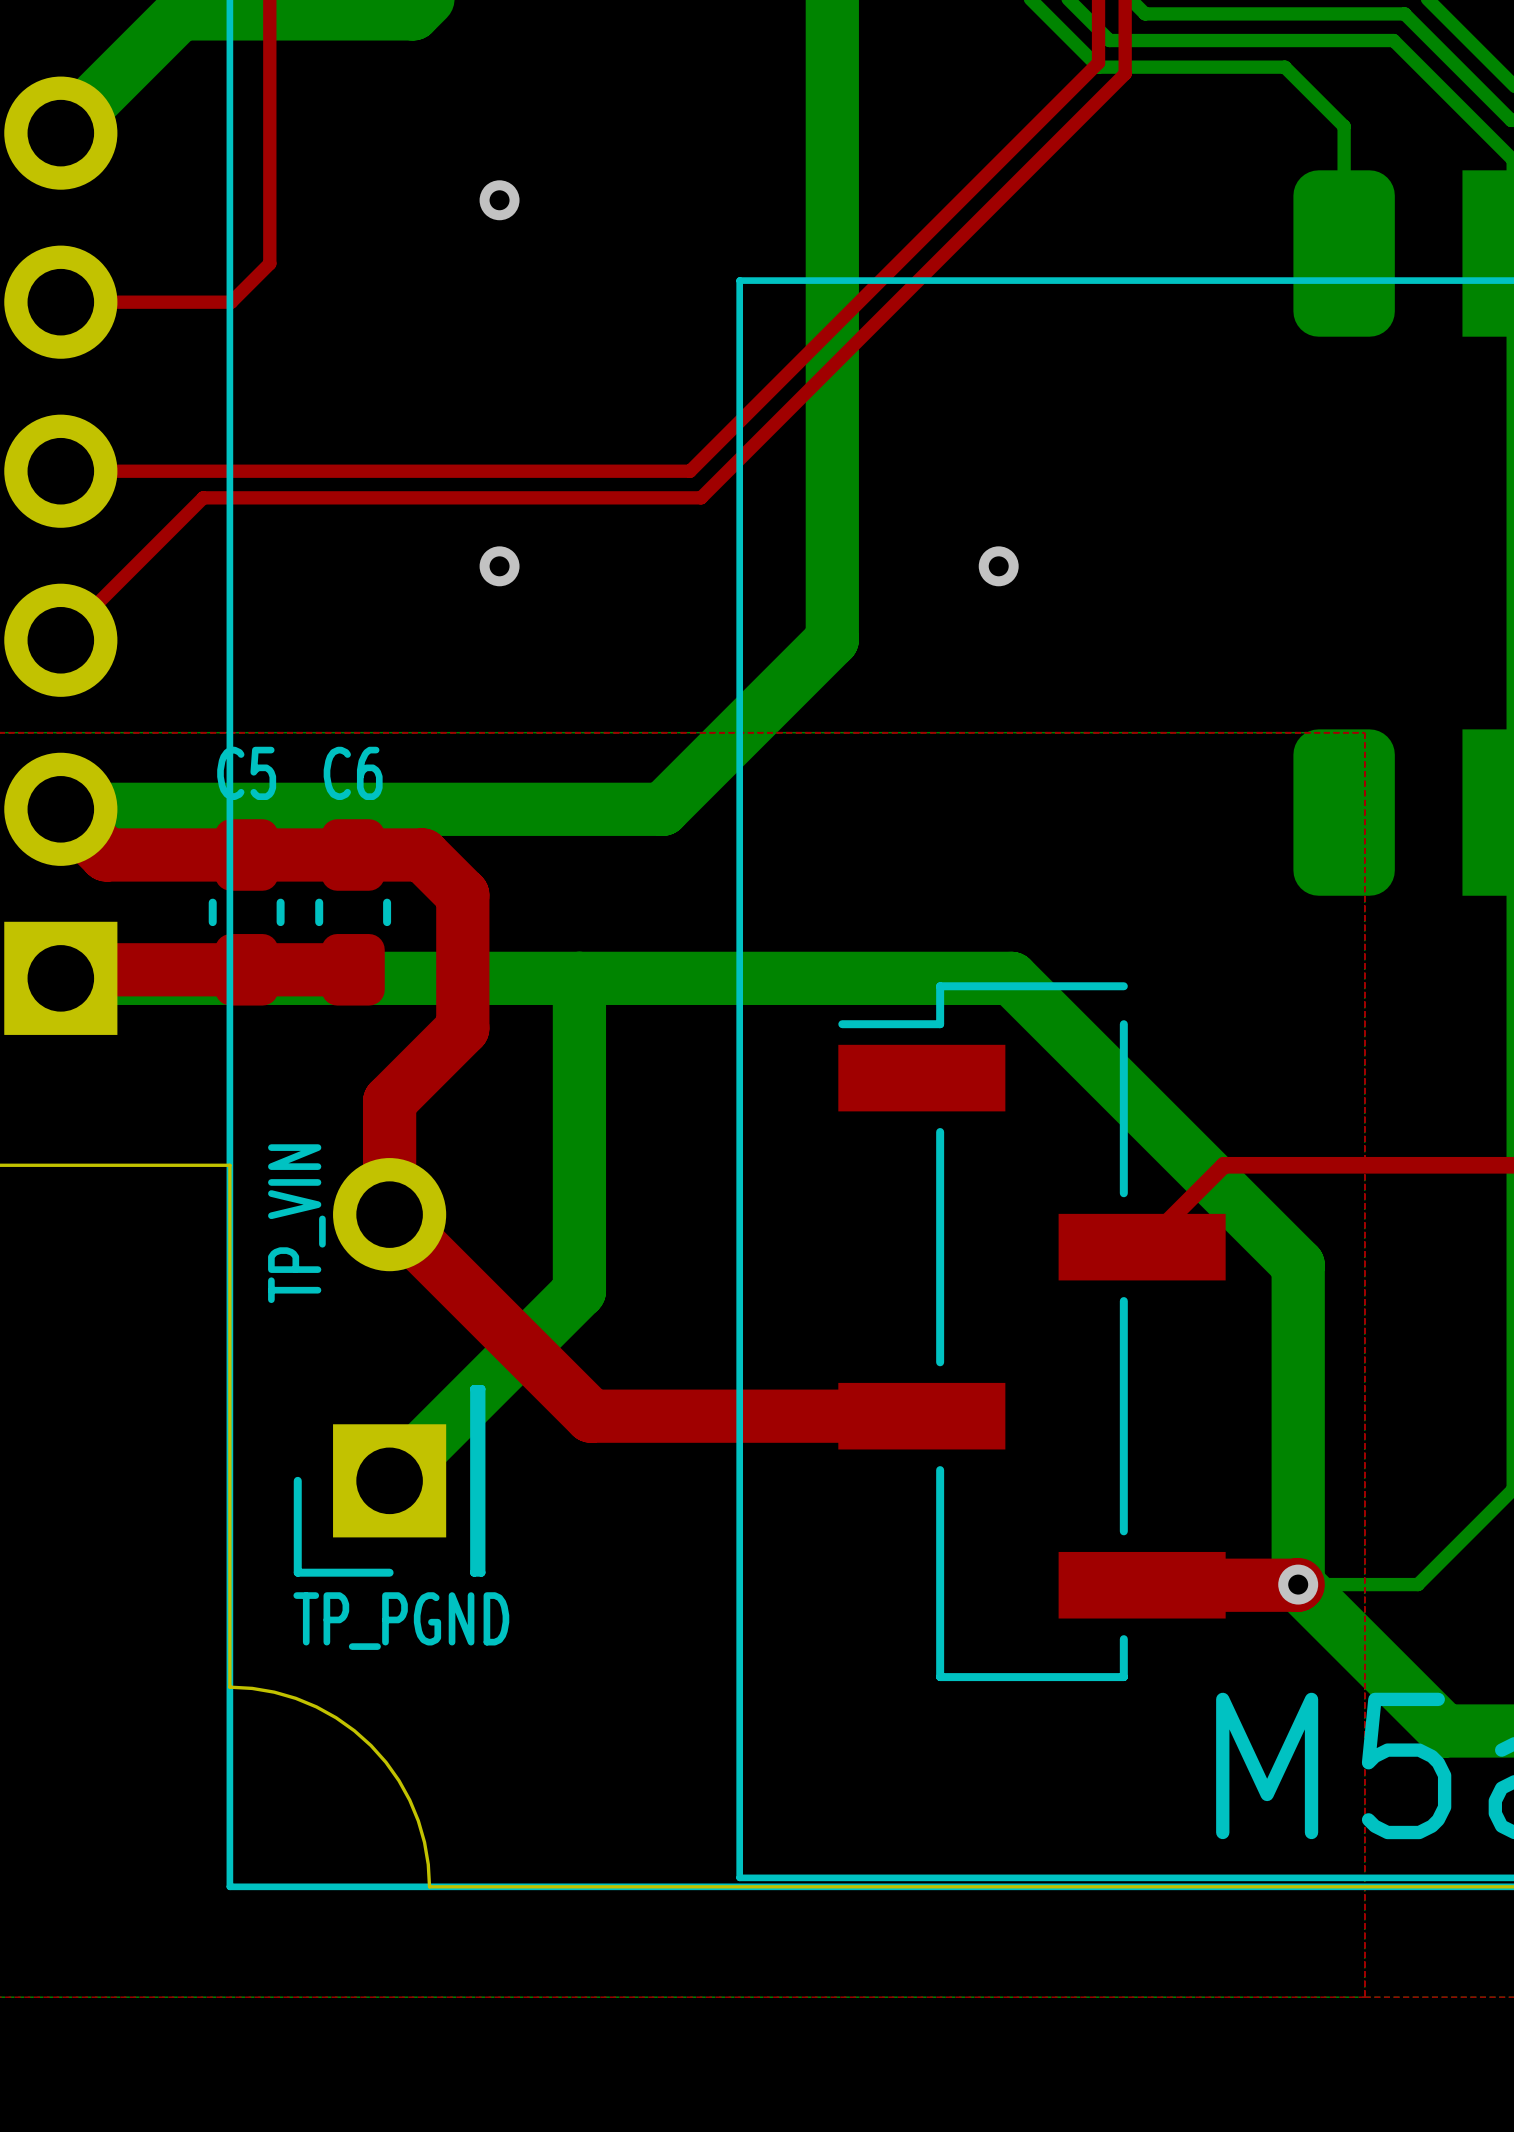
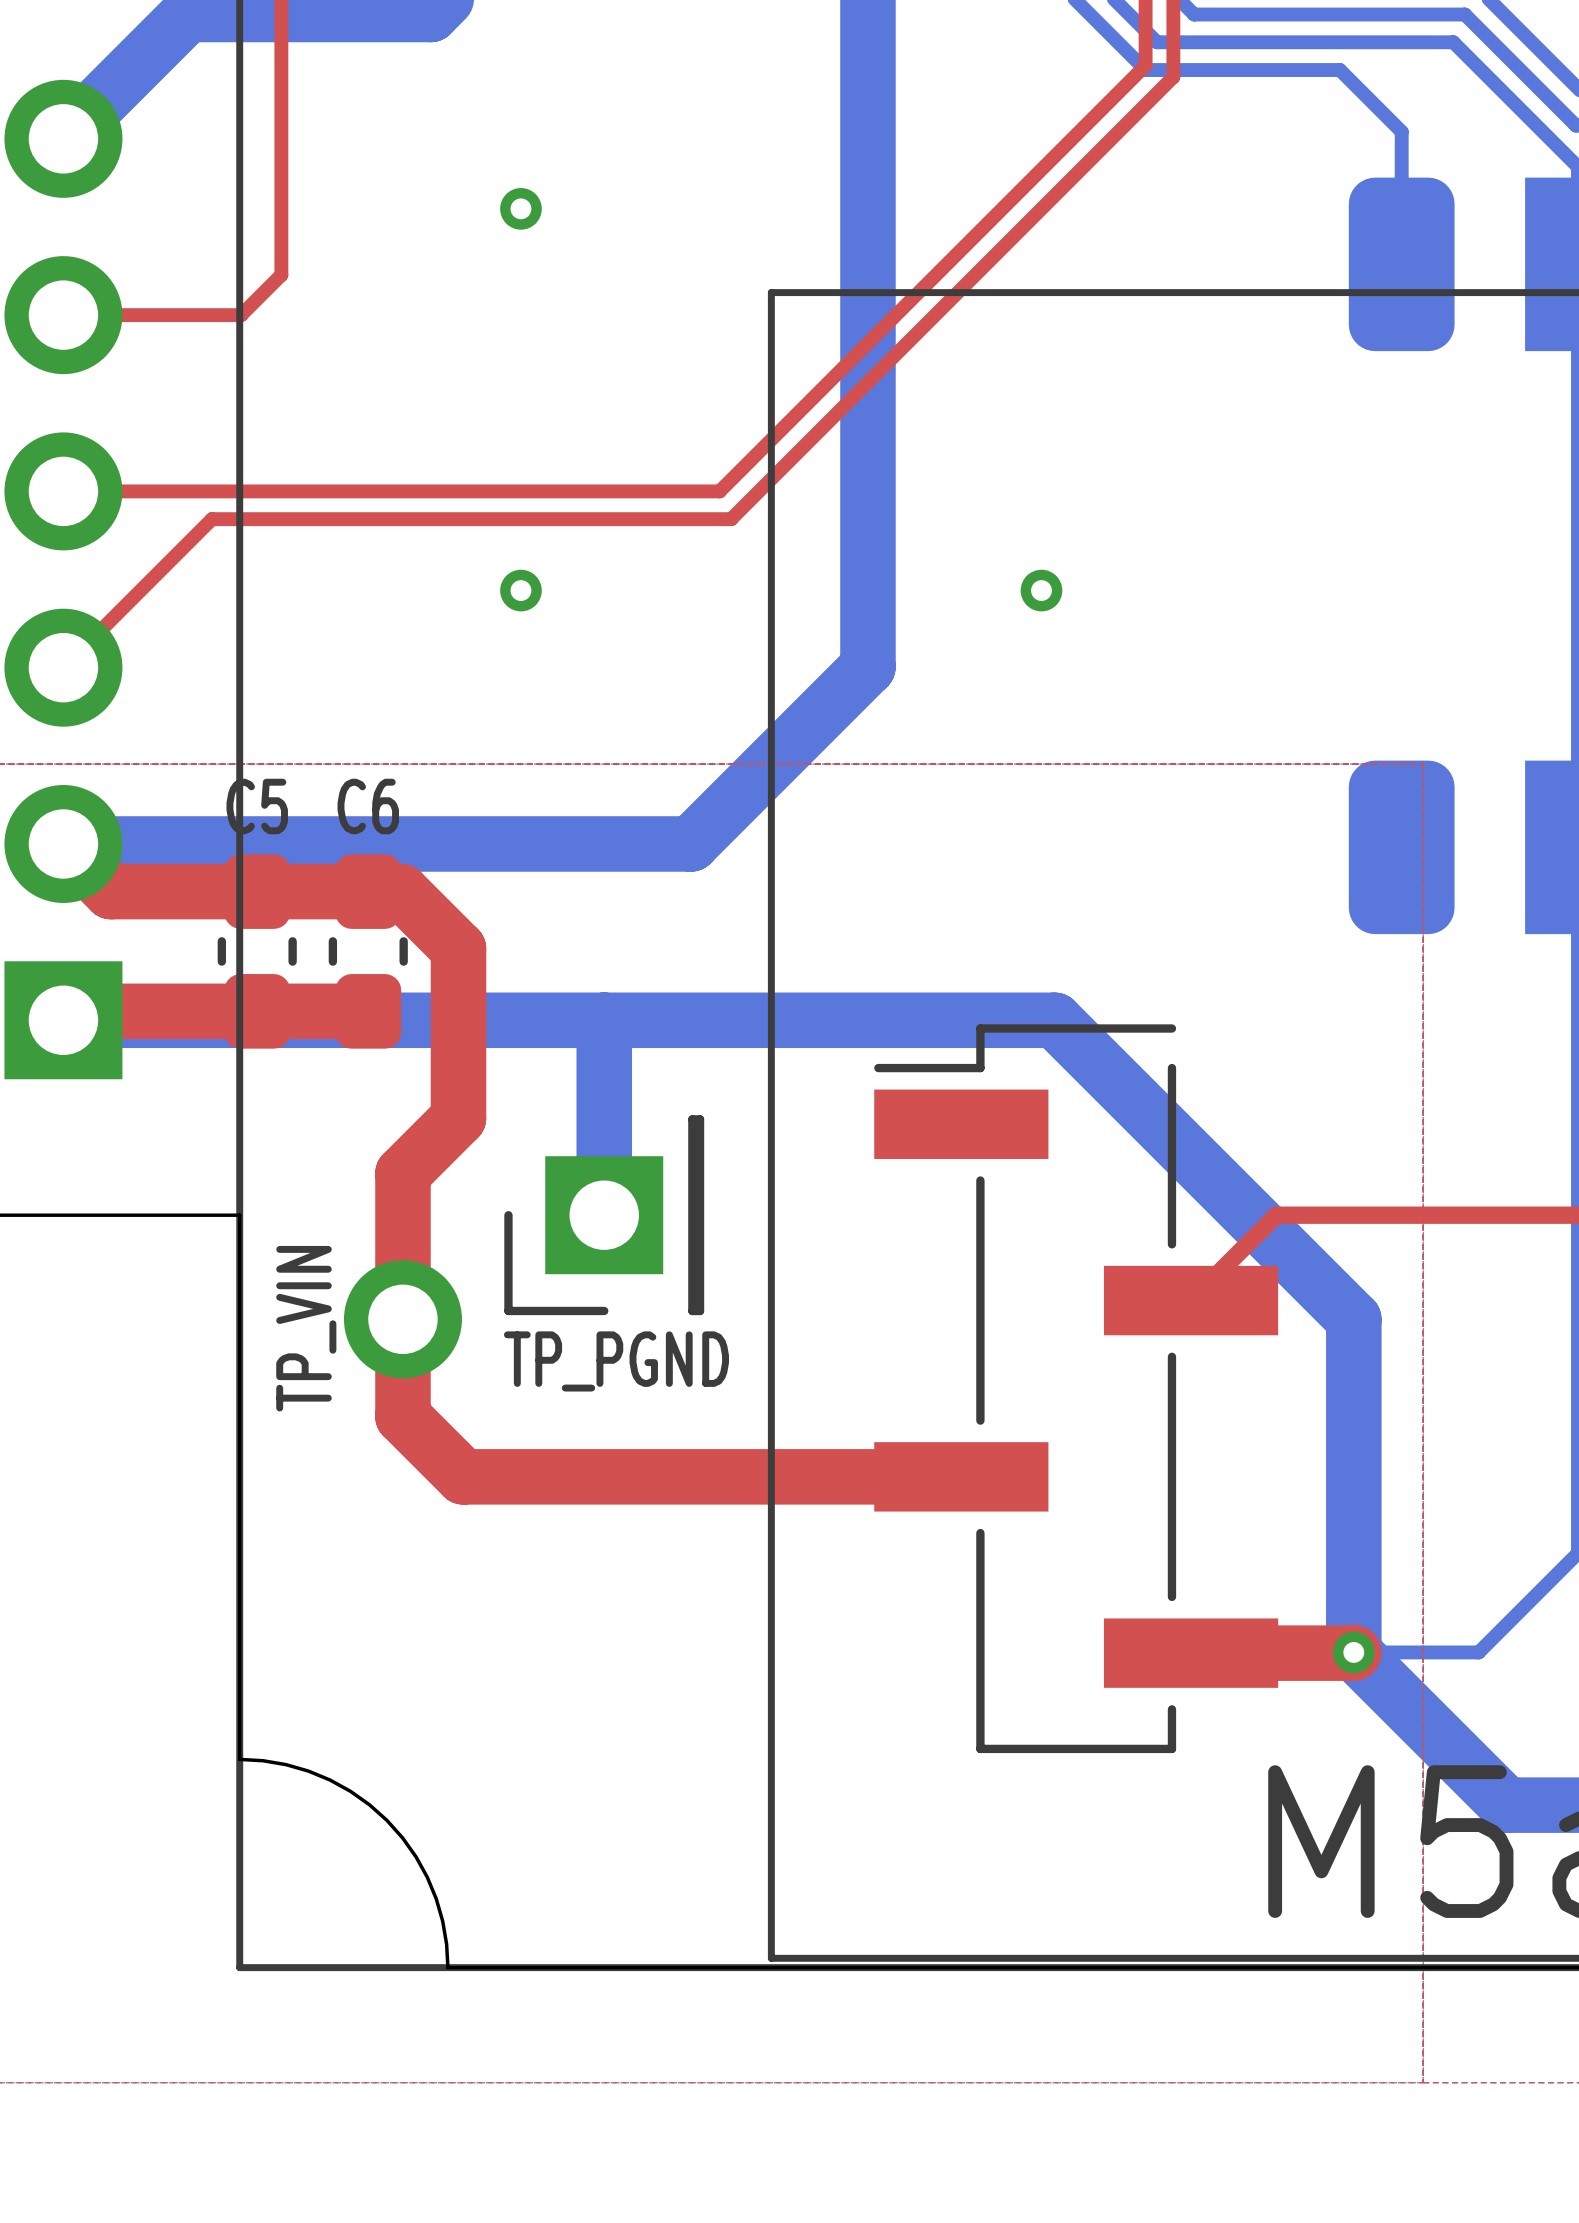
top track: (384, 854) (422, 854) (462, 895) (462, 1028) (389, 1101) (389, 1214) (591, 1416) -> (401, 891) (458, 948) (458, 1118) (402, 1173) (402, 1416) (463, 1476) (616, 1476)
bottom track: (579, 1165) (579, 1291) (389, 1480) -> none
part position: (389, 1214) -> (402, 1319)
part position: (389, 1480) -> (604, 1215)

